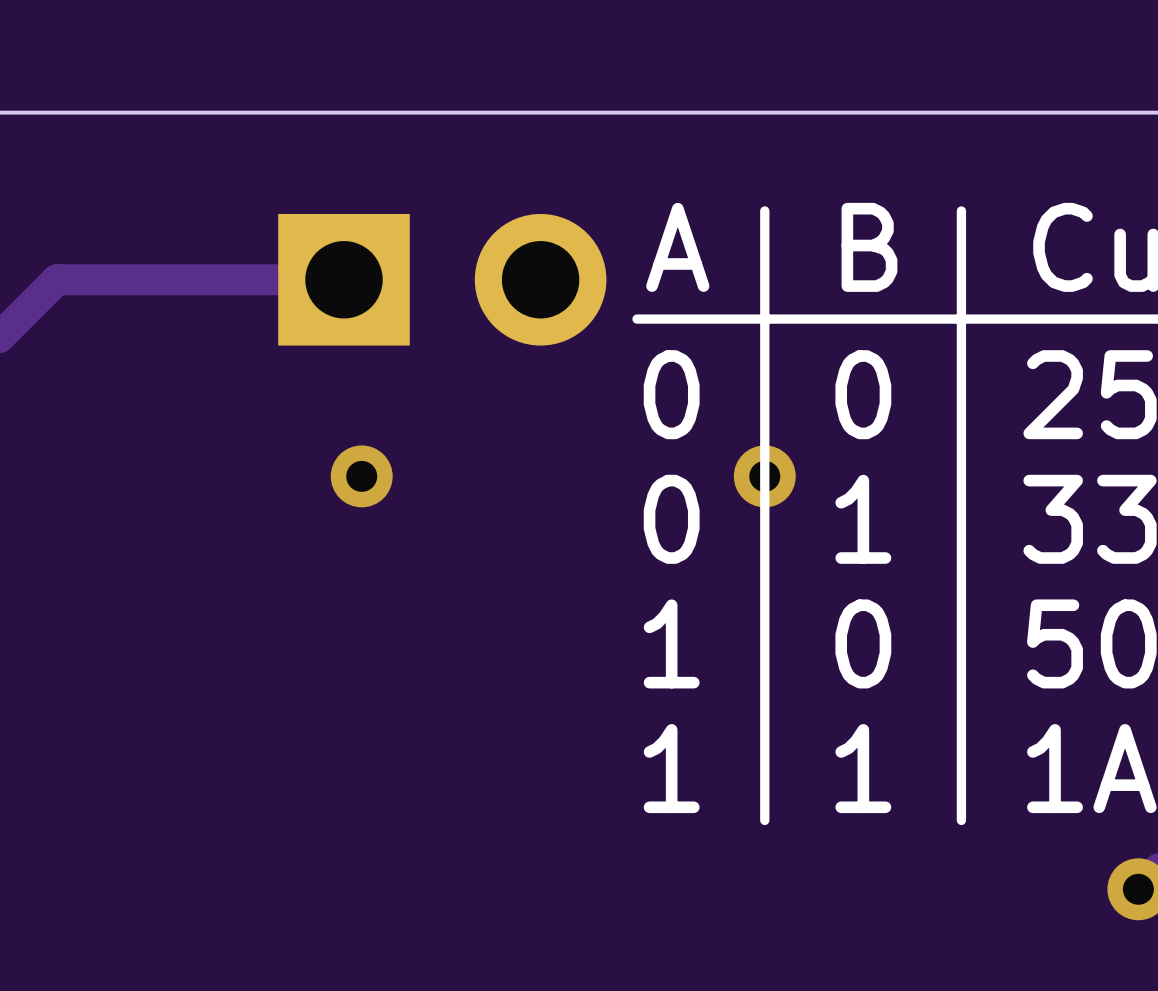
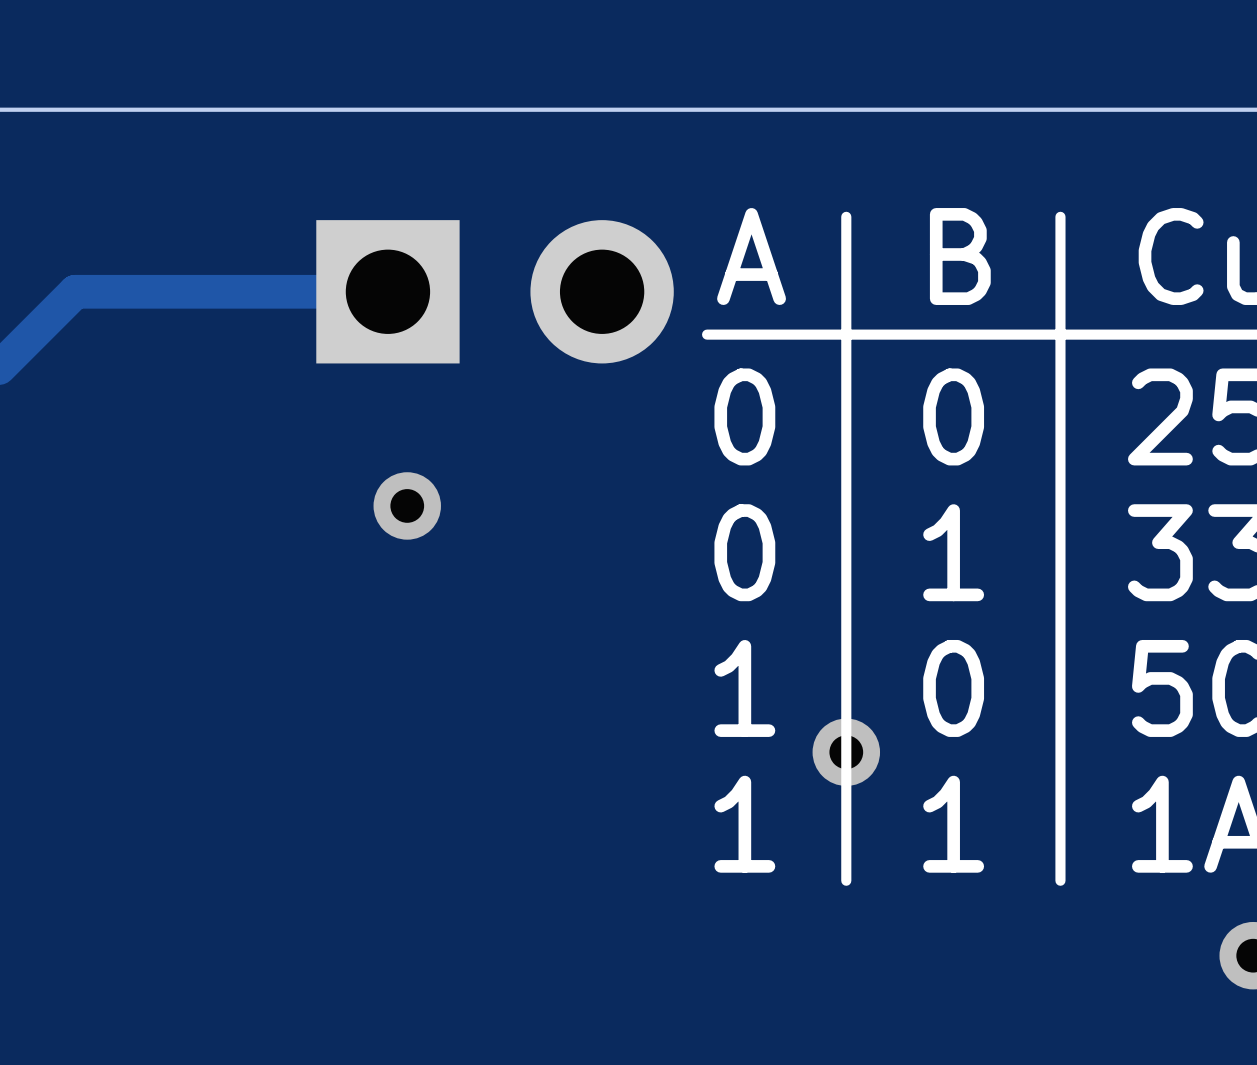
via position: (764, 476) -> (846, 752)

